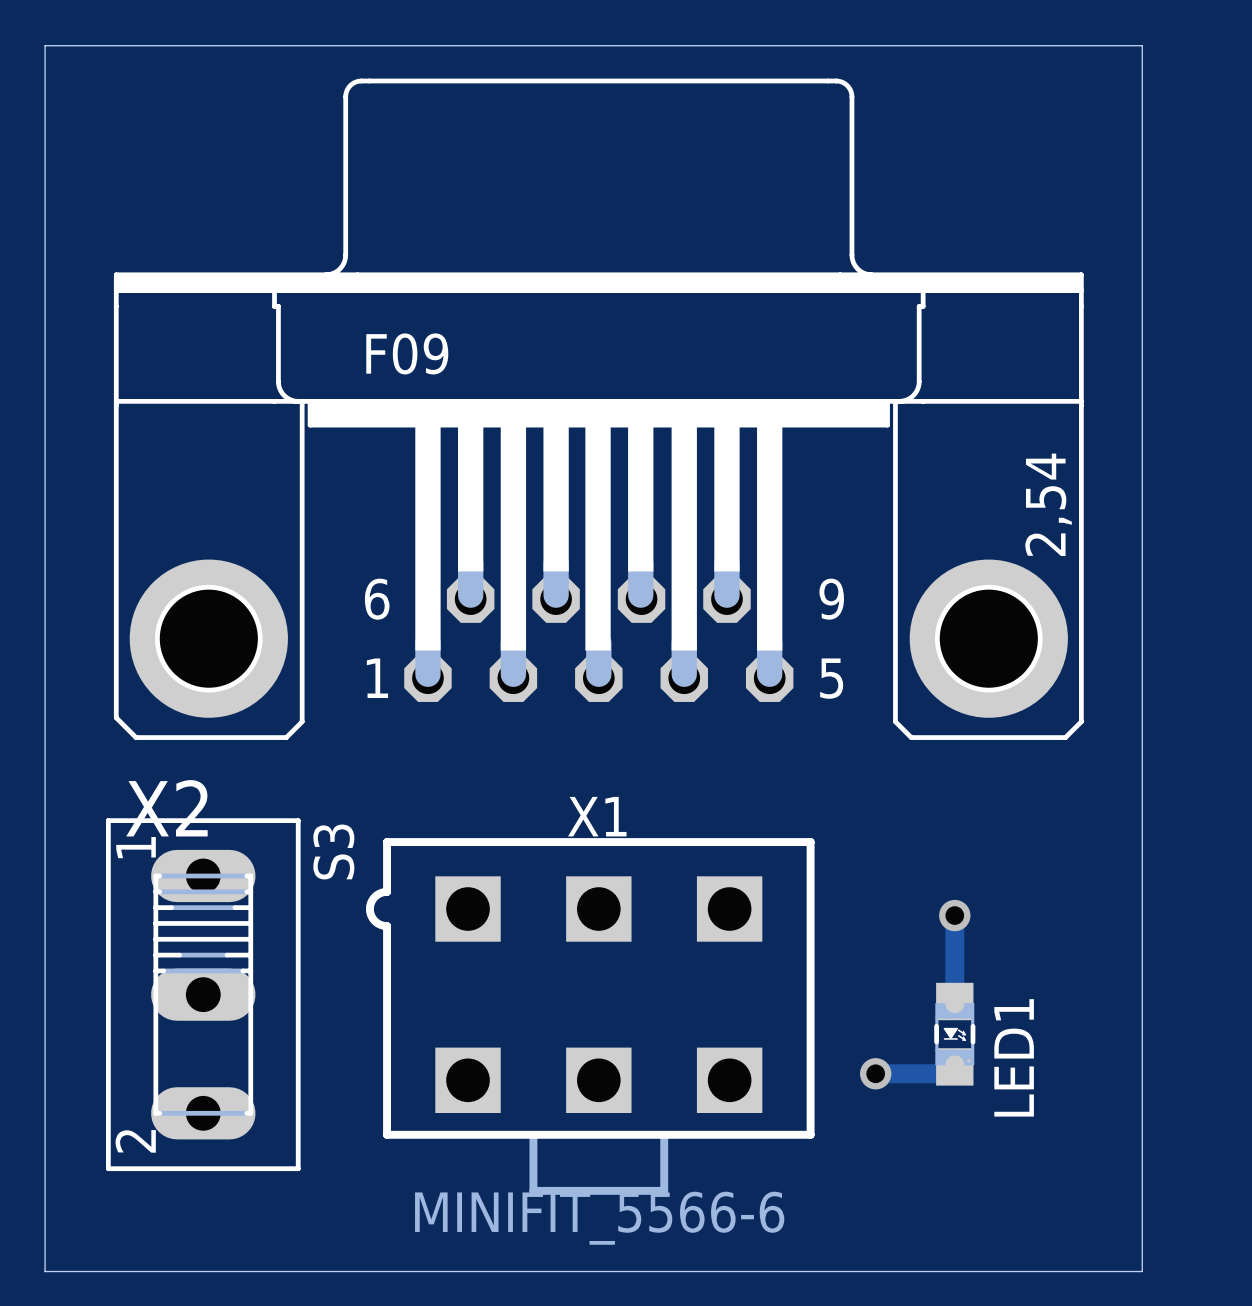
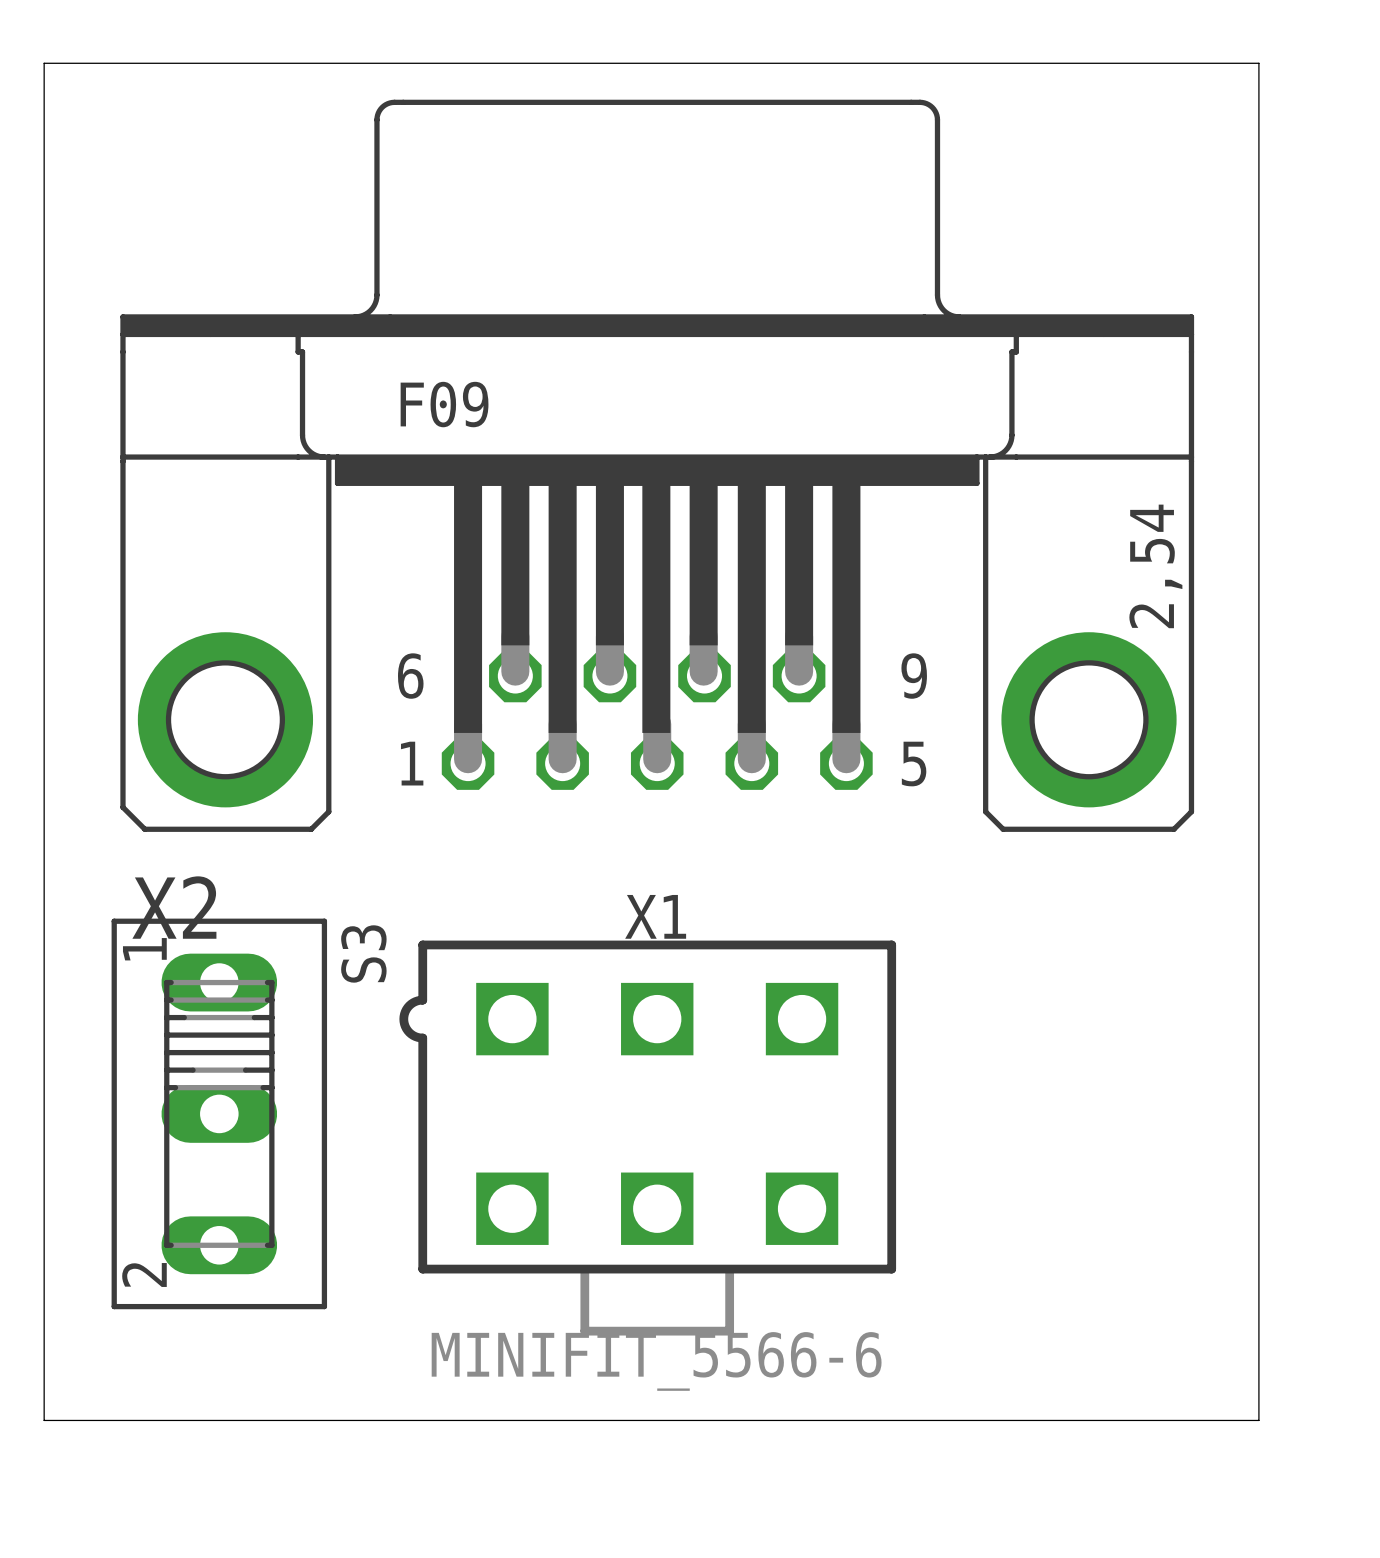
track: (954, 915) (954, 1001) -> none
via: (954, 915) -> none
LED1: (954, 1034) -> none
track: (954, 1066) (954, 1073) (875, 1073) -> none
via: (875, 1073) -> none

